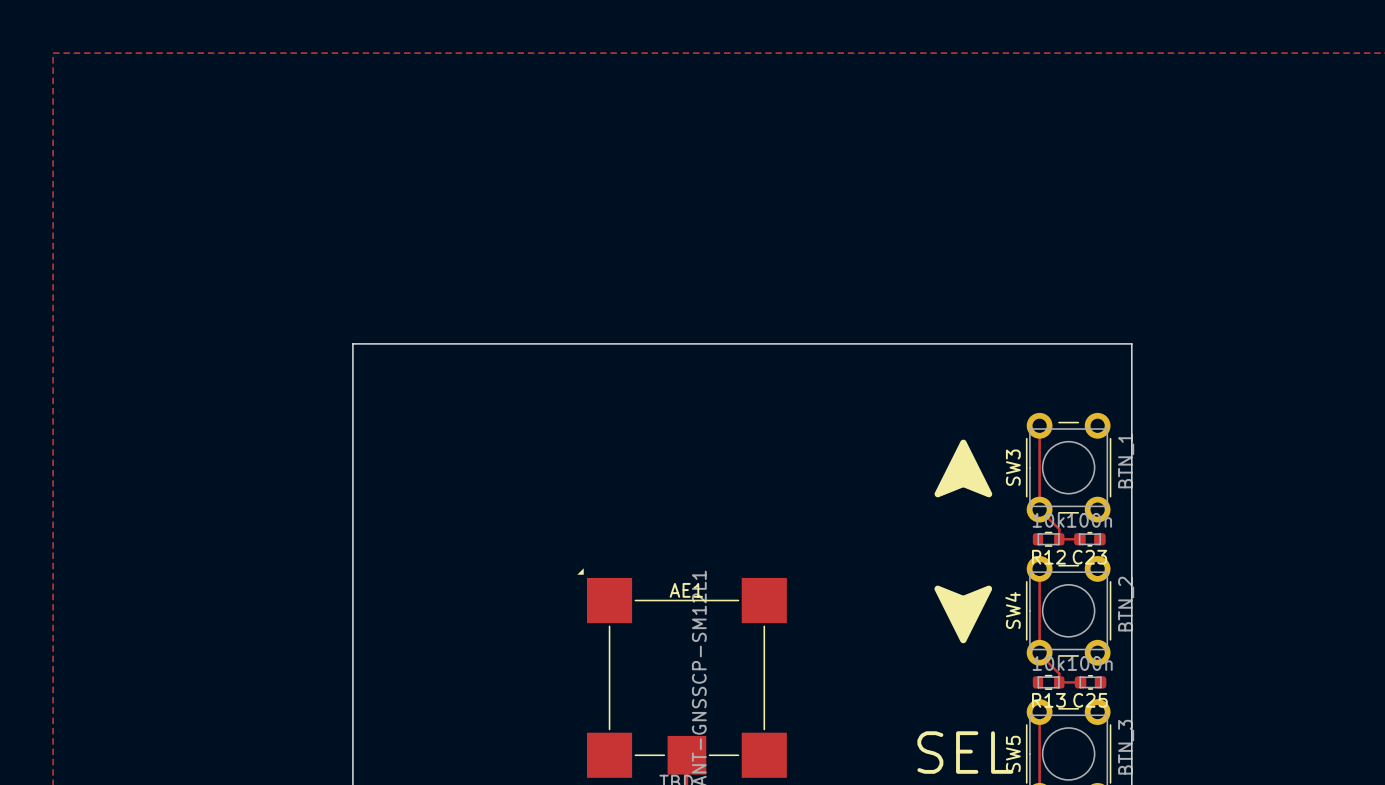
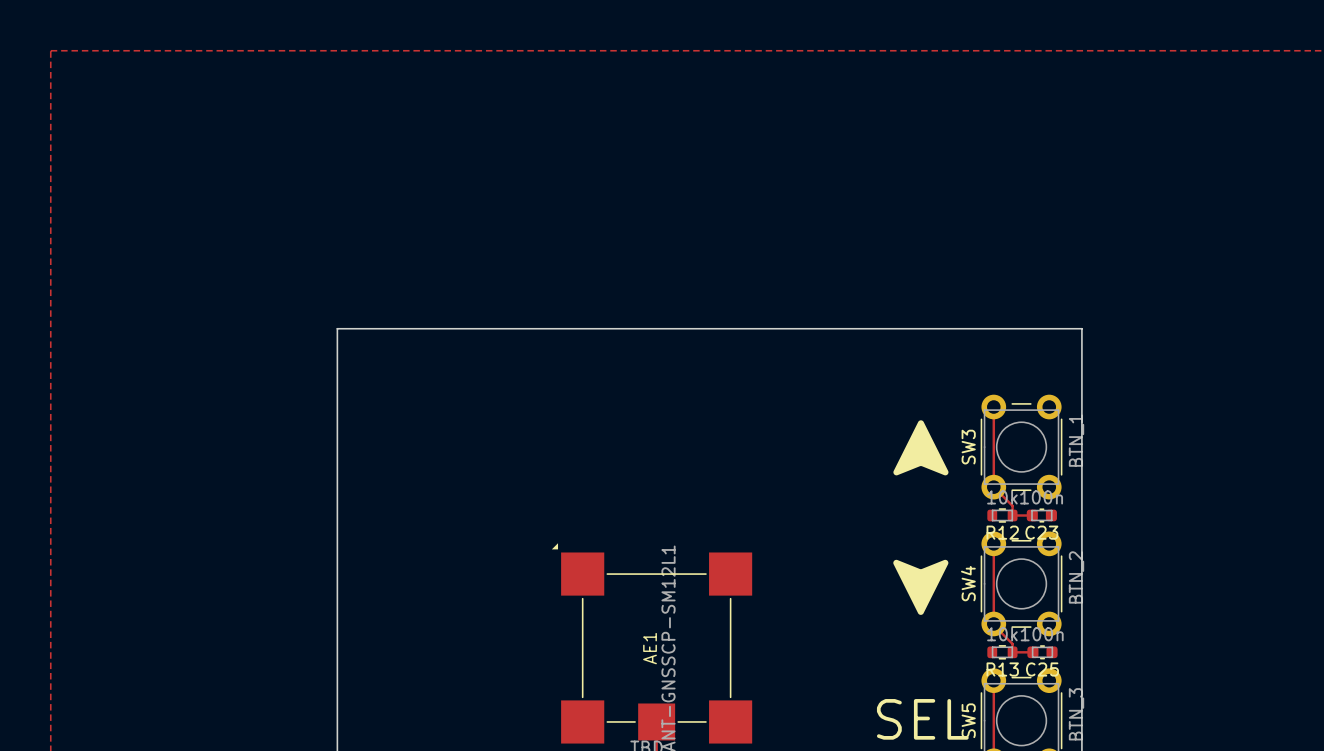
AE1 name rotation: 0° (686, 590) -> 90° counterclockwise (650, 648)
AE1 name position: AE1 (686, 590) -> AE1 (650, 648)

